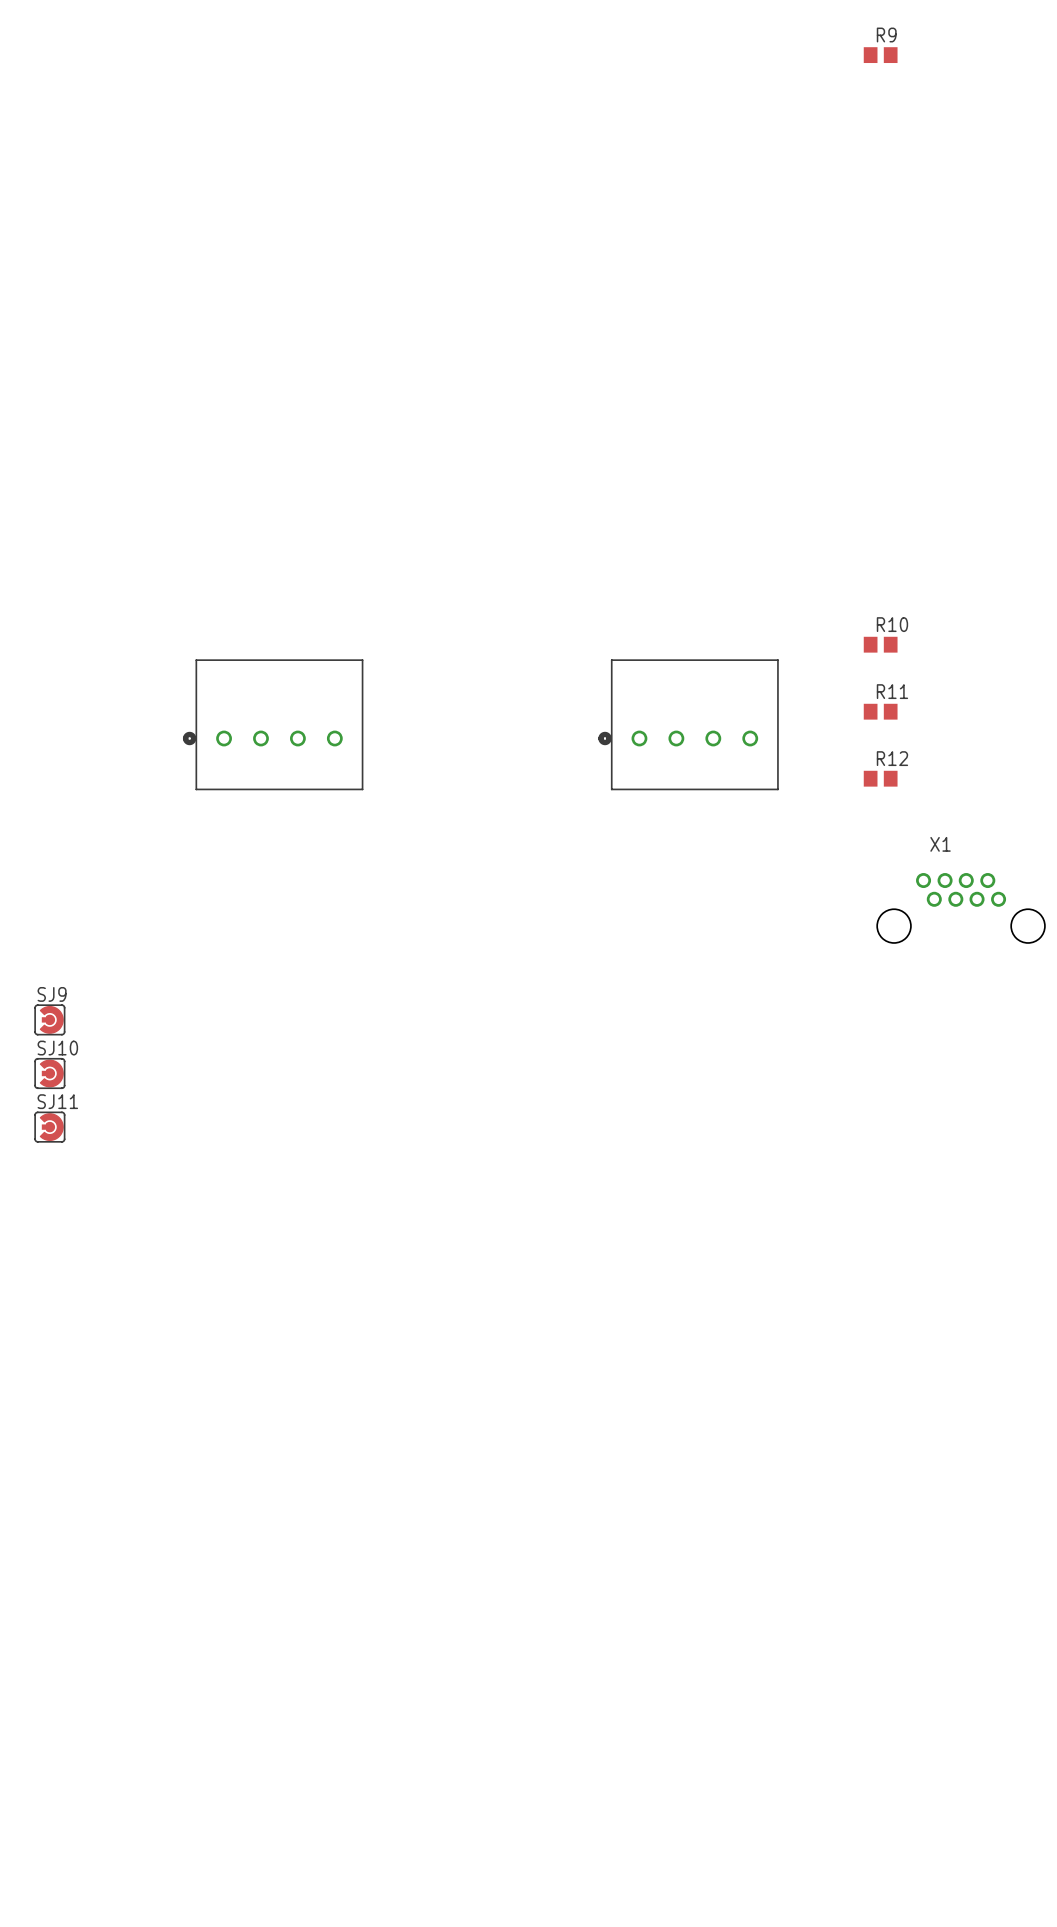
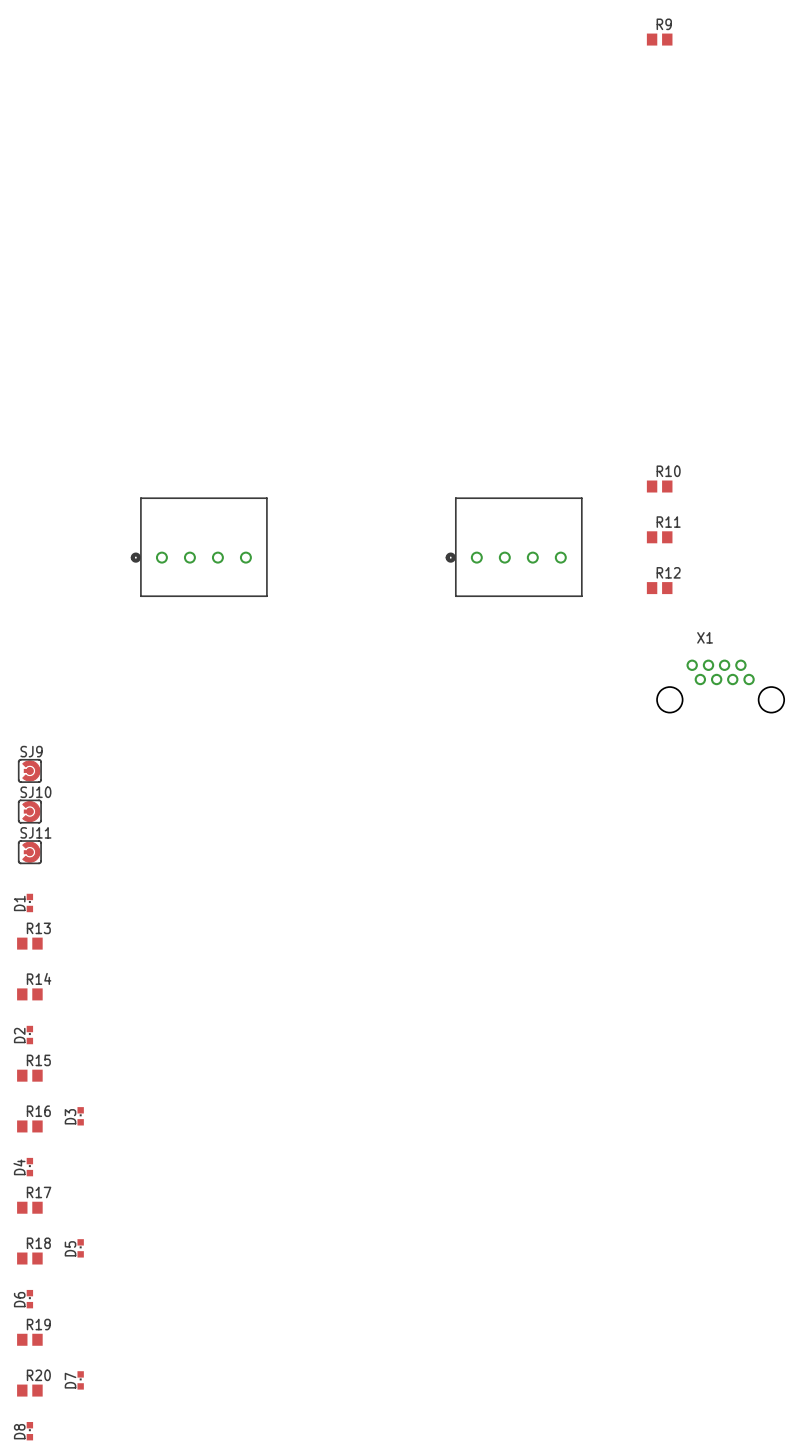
D1: none -> (29, 902)
R13: none -> (29, 943)
R14: none -> (29, 994)
D2: none -> (29, 1035)
R15: none -> (29, 1075)
D3: none -> (80, 1116)
R16: none -> (29, 1126)
D4: none -> (29, 1167)
R17: none -> (29, 1207)
D5: none -> (80, 1248)
R18: none -> (29, 1258)
D6: none -> (29, 1299)
R19: none -> (29, 1339)
D7: none -> (80, 1380)
R20: none -> (29, 1390)
D8: none -> (29, 1431)

